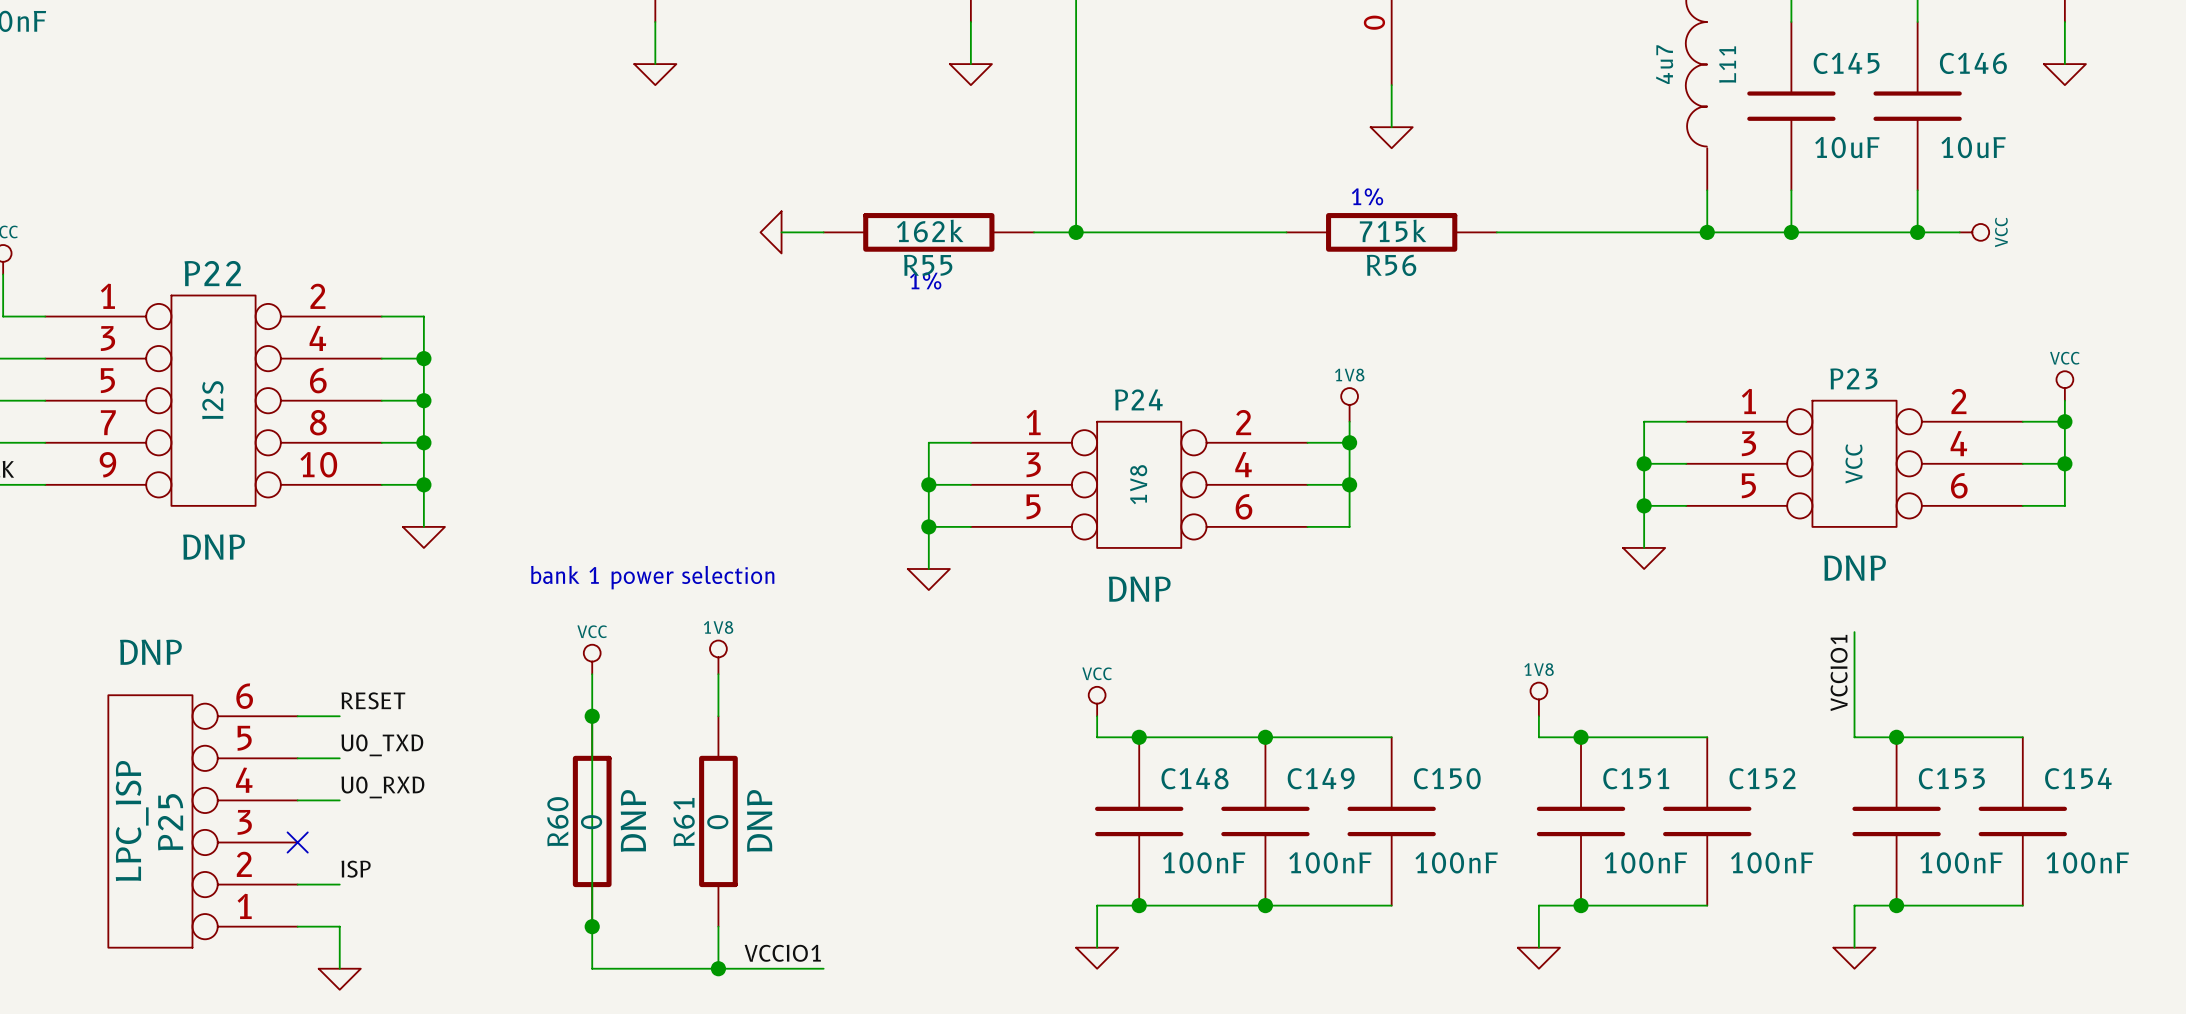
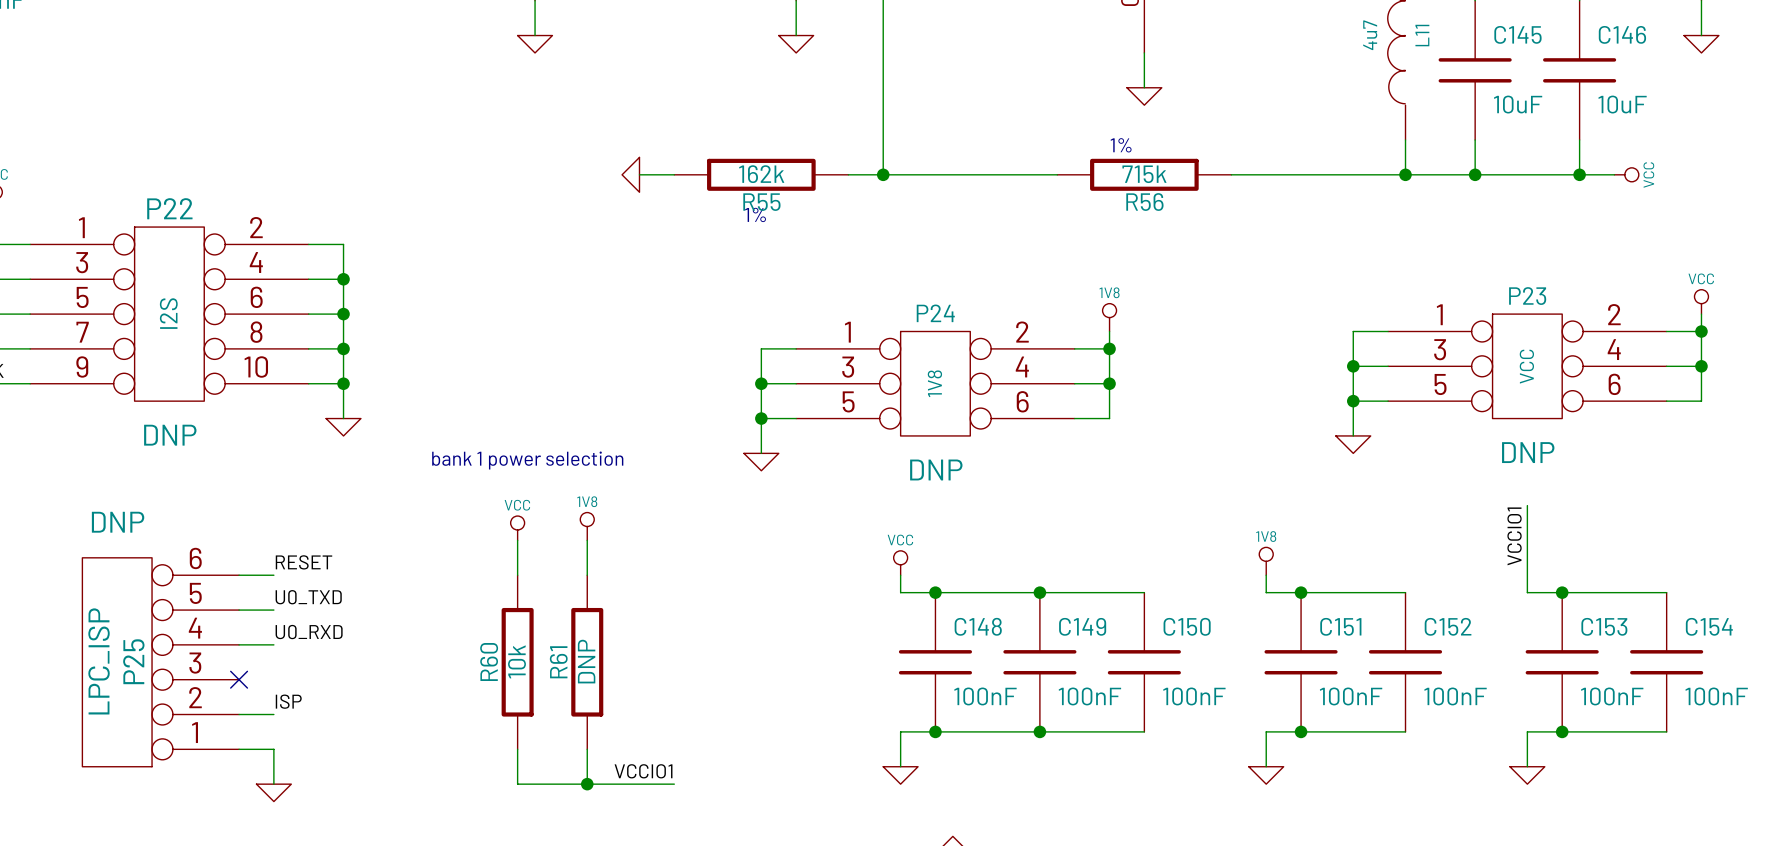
power symbol position: VCC (592, 659) -> VCC (517, 528)
wire: (592, 674) (592, 968) (634, 968) -> (517, 749) (517, 784)
wire: none -> (517, 540) (517, 575)
junction: (592, 716) -> none
R60 text: DNP (633, 820) -> none
R61 text: DNP (759, 820) -> none
R60 position: (592, 821) -> (517, 662)
R60 value: 0 (591, 822) -> 10k (516, 661)
R61 value: 0 (717, 822) -> DNP (586, 661)
junction: (592, 926) -> none

